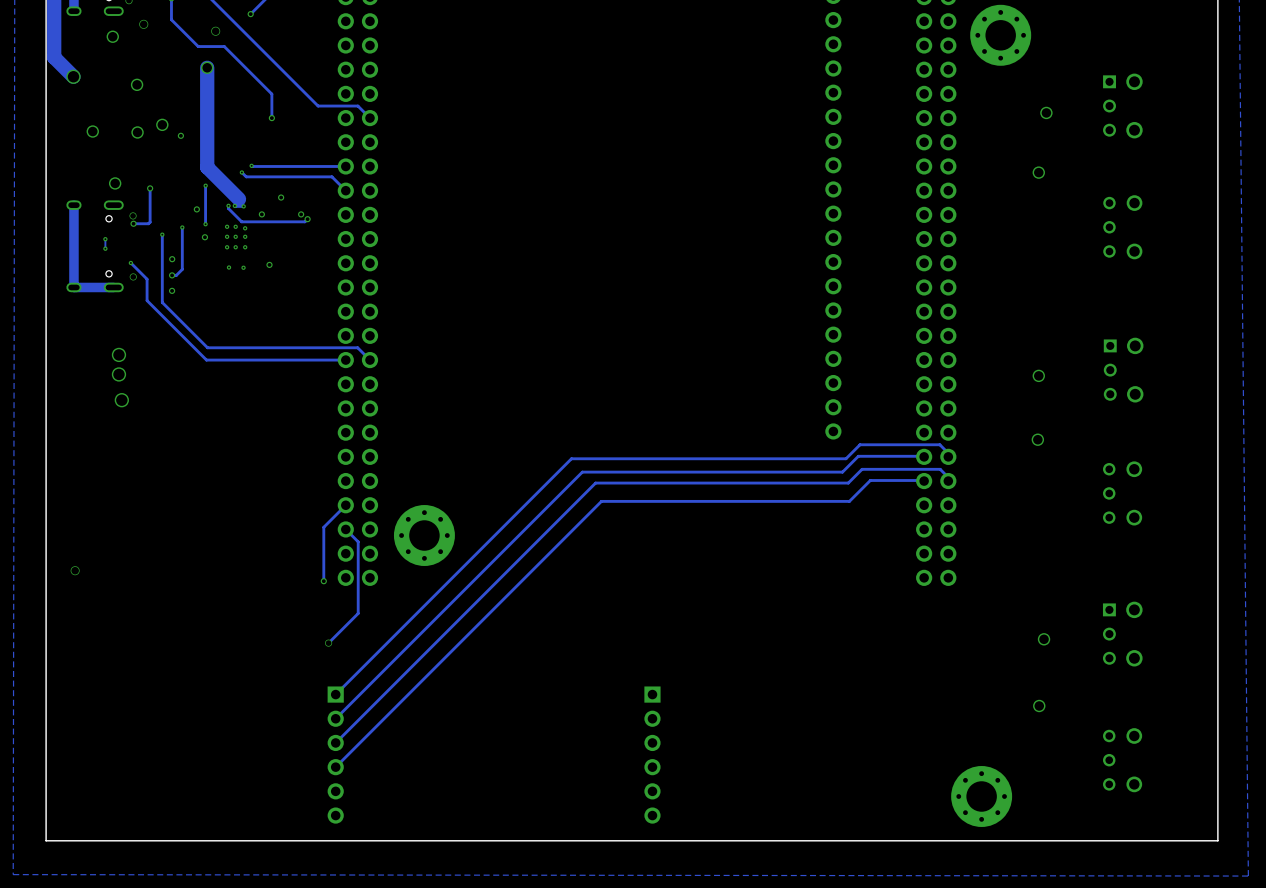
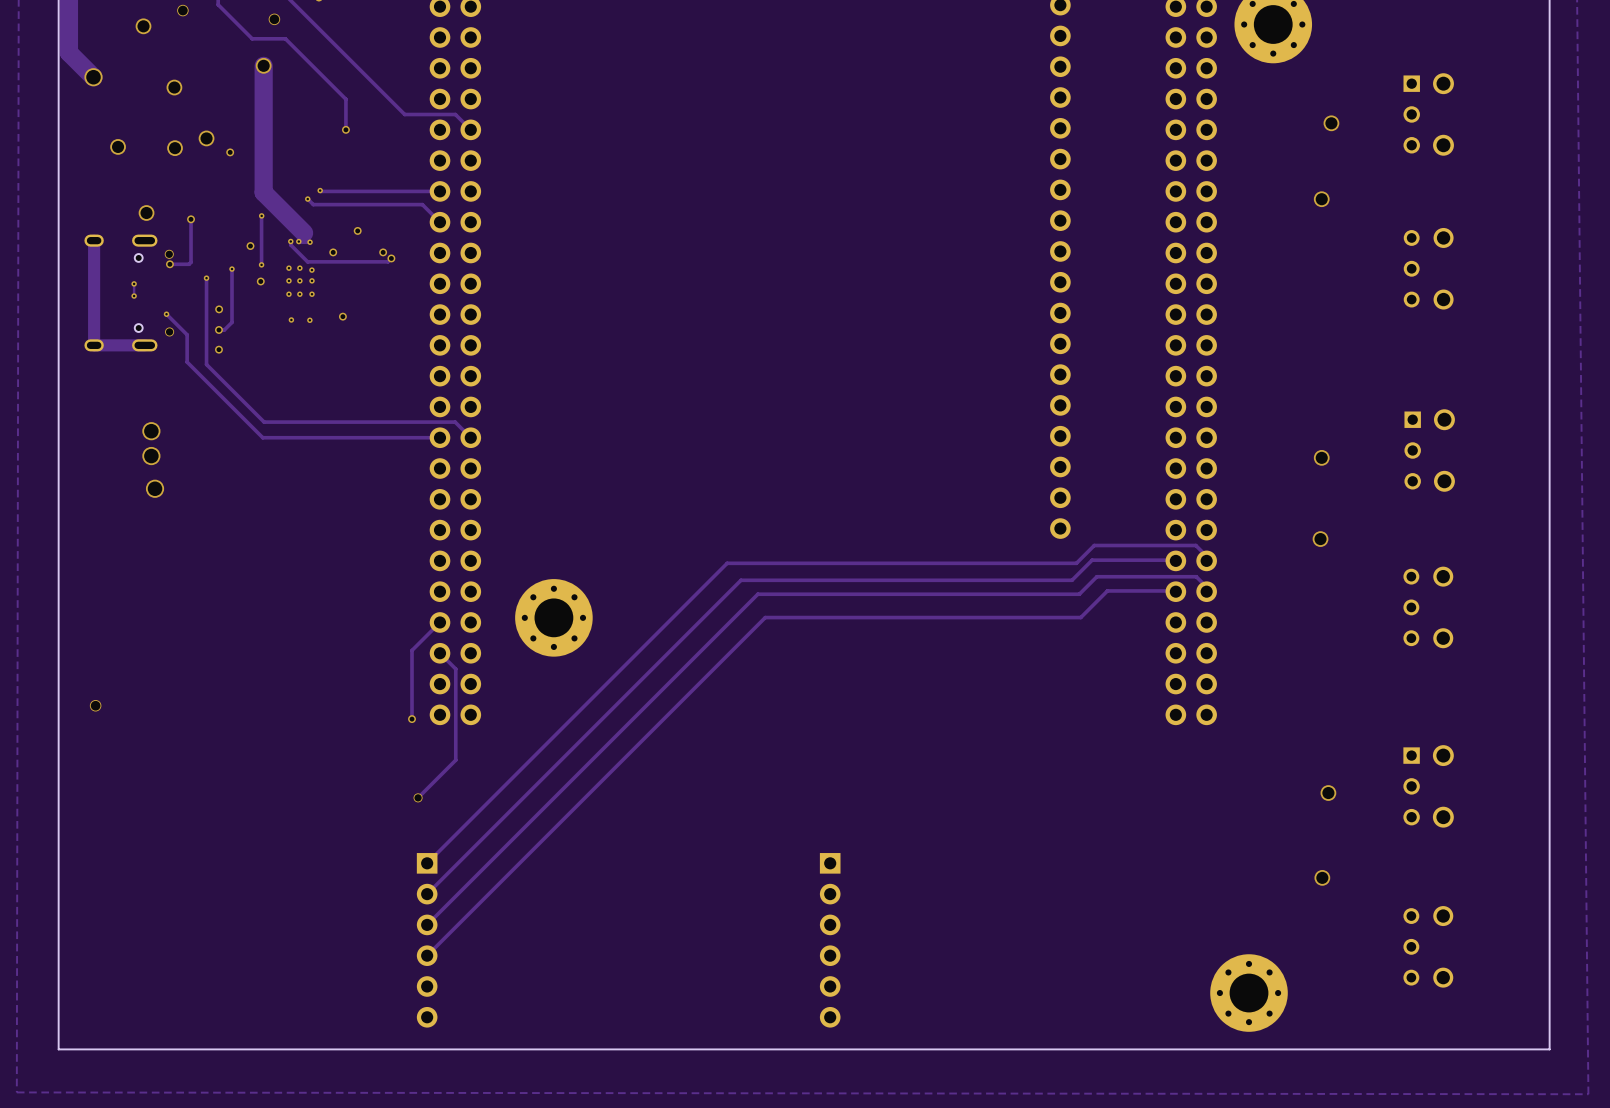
part position: (424, 535) -> (553, 617)

